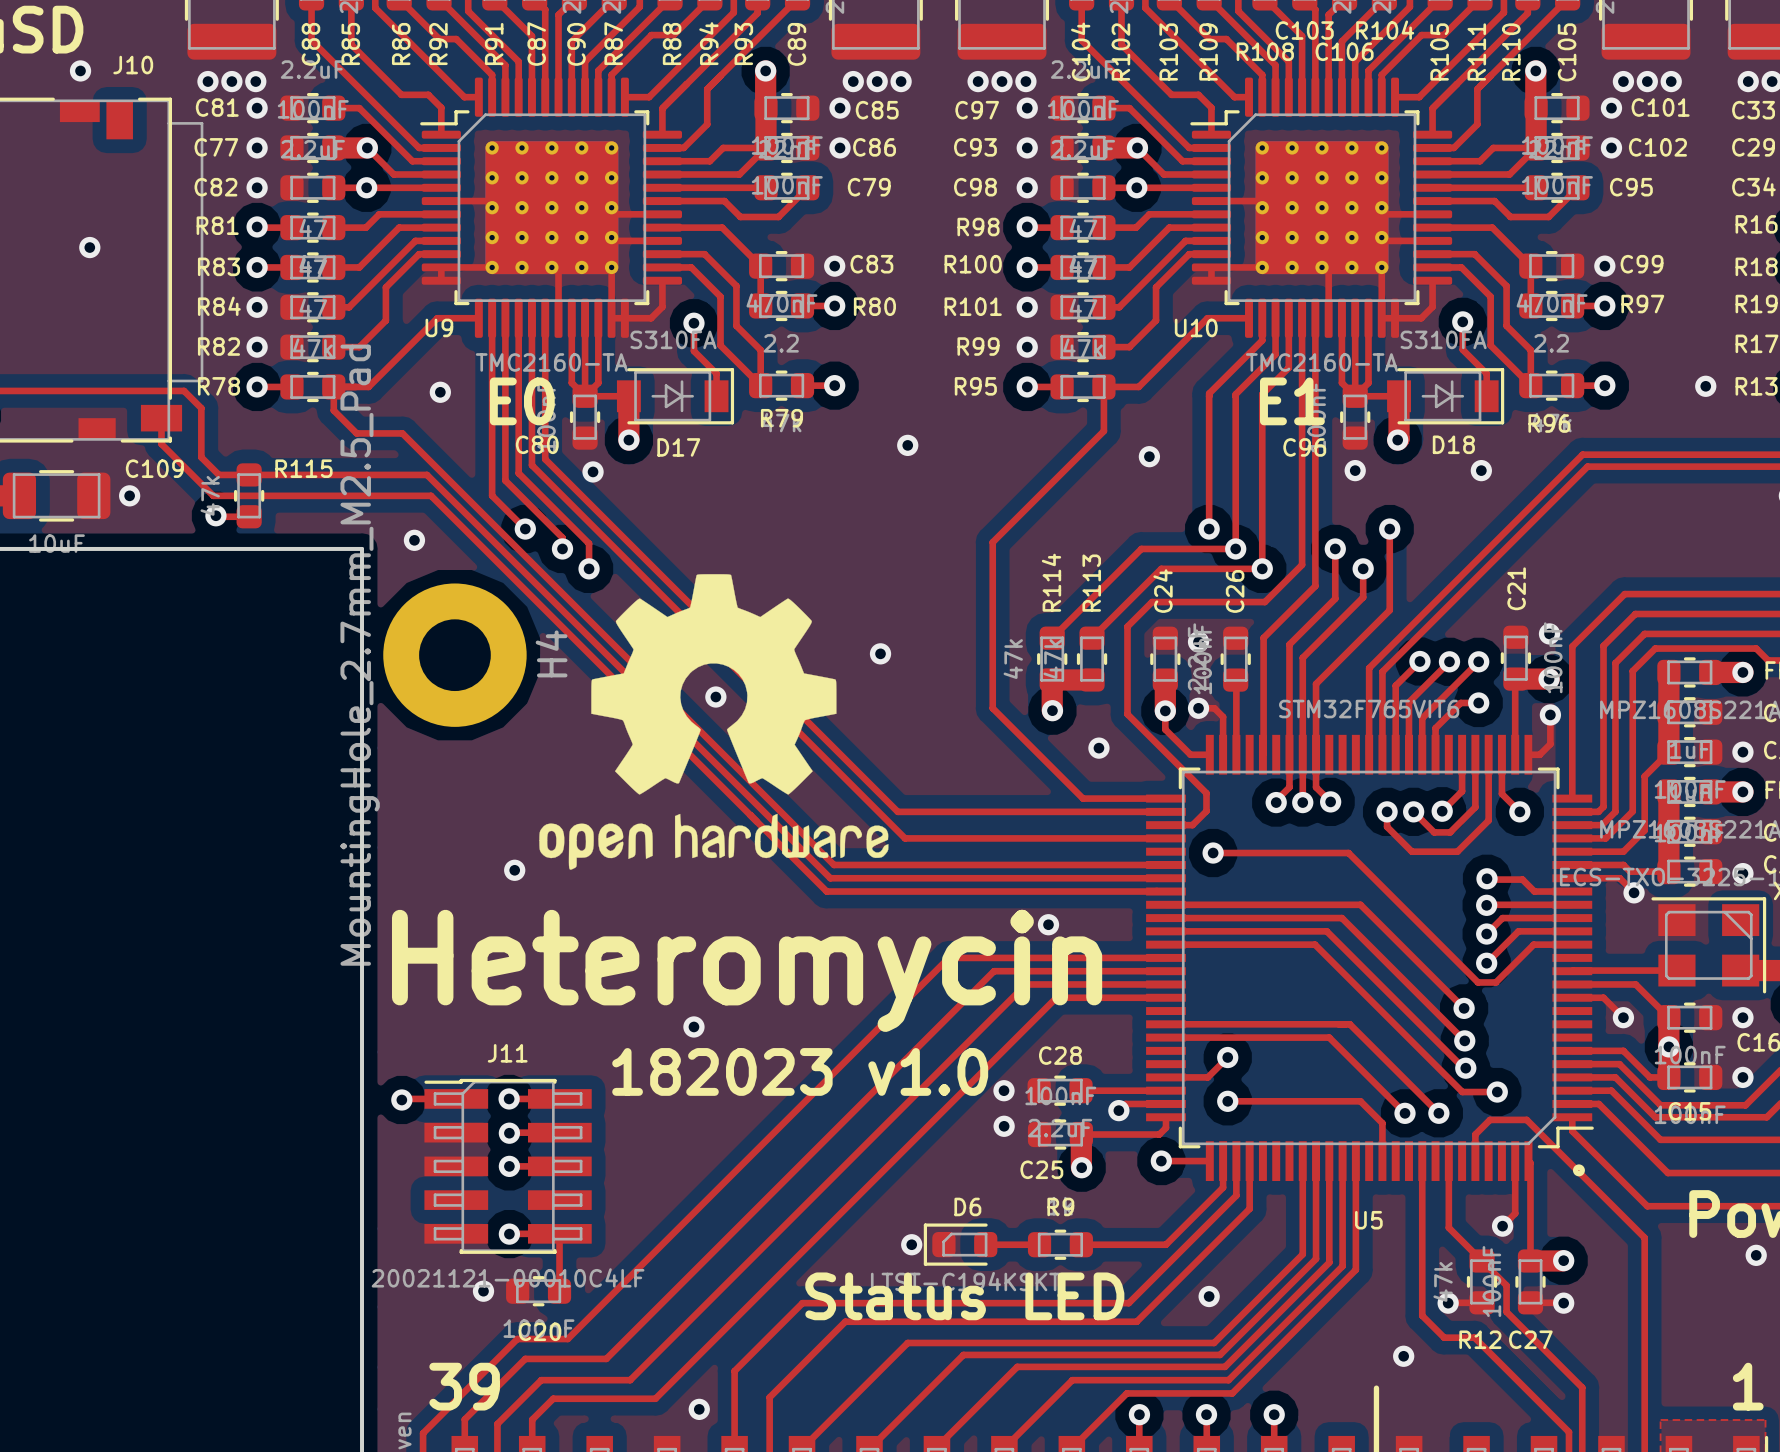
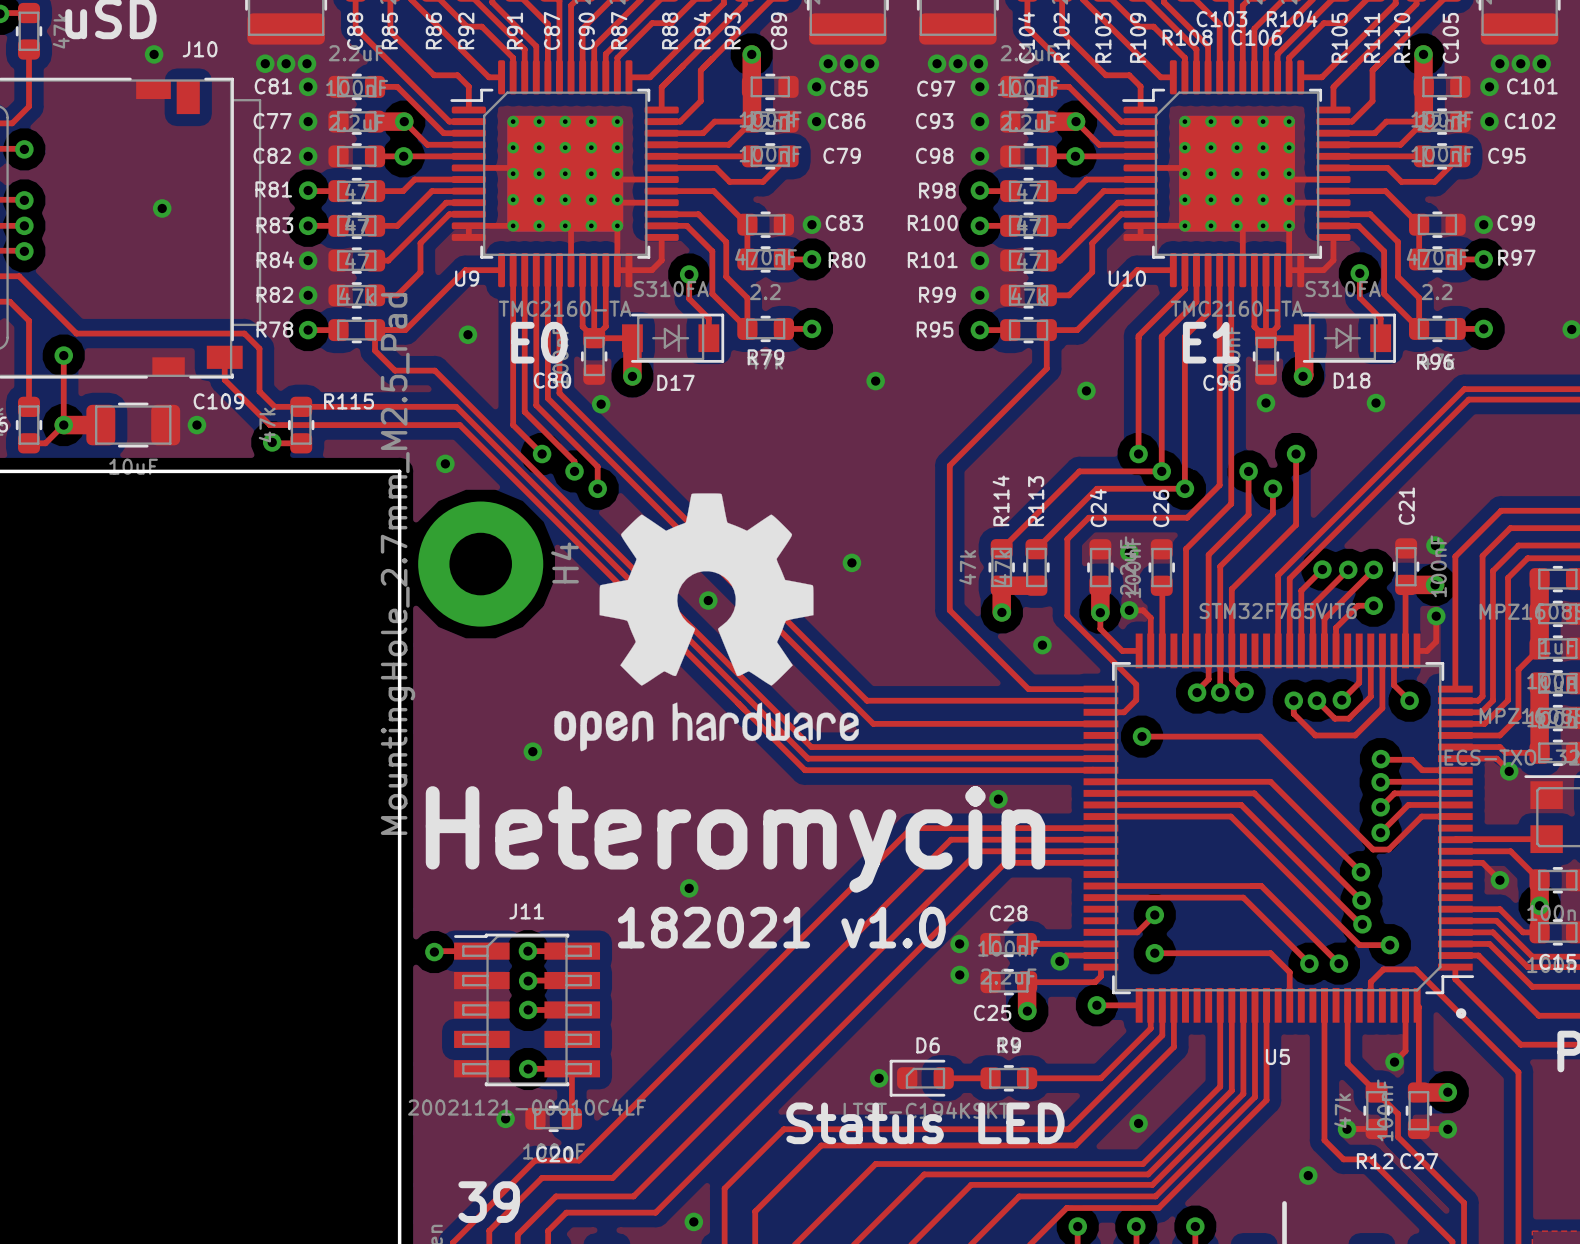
text: 182023 v1.0 (800, 1071) -> 182021 v1.0 (781, 927)

